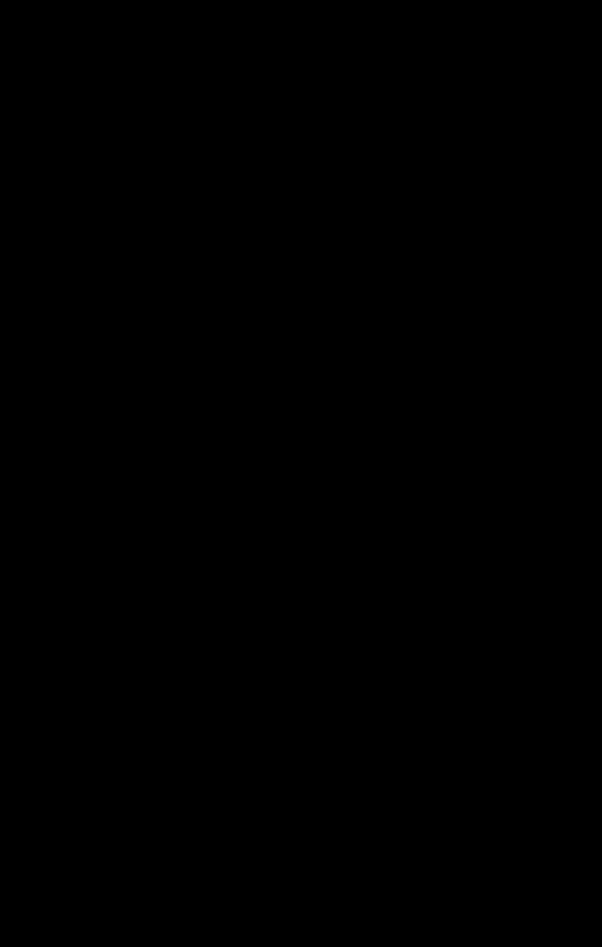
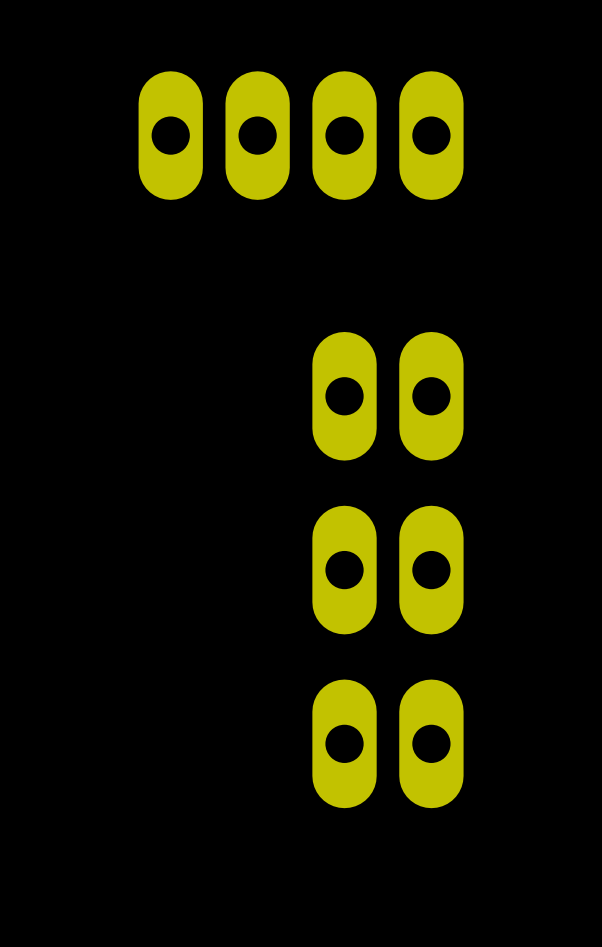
part: none -> (301, 135)
part: none -> (387, 396)
part: none -> (387, 570)
part: none -> (387, 743)

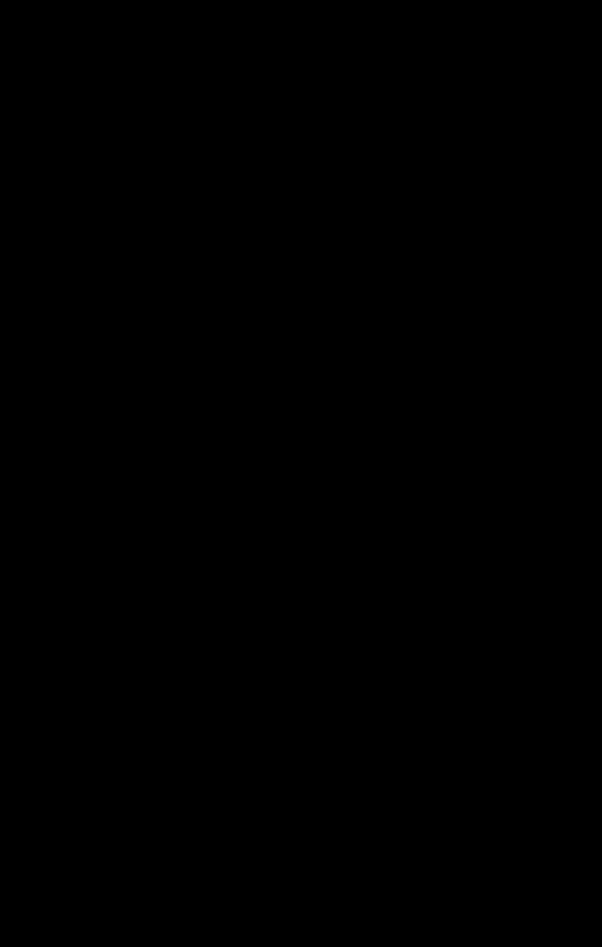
part: (301, 135) -> none
part: (387, 396) -> none
part: (387, 570) -> none
part: (387, 743) -> none

